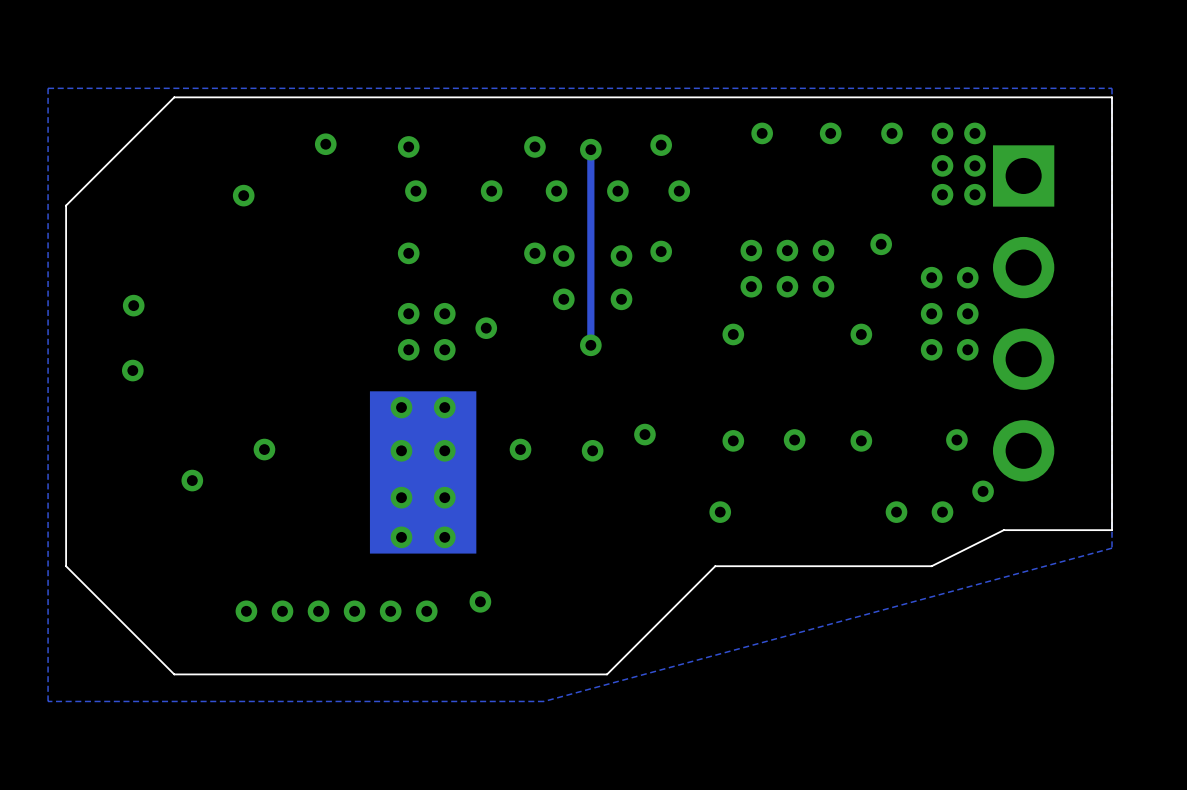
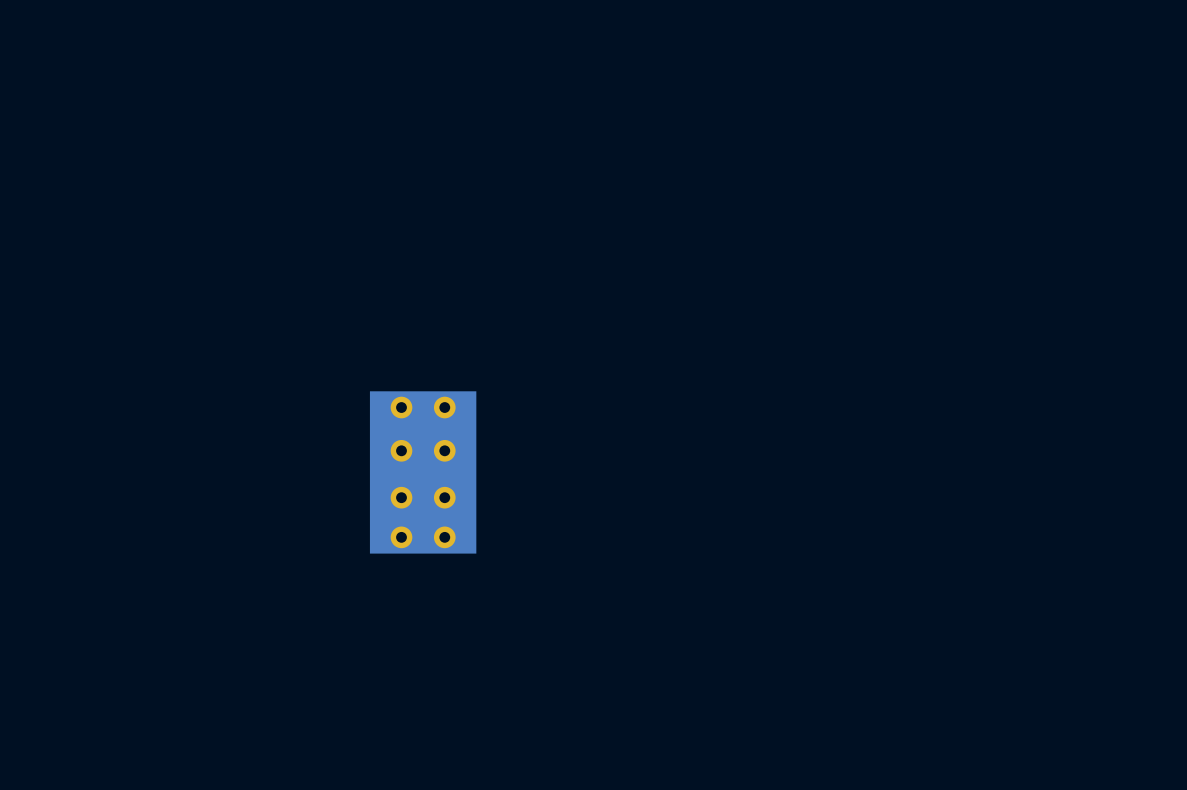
zone outline: (1112, 88) (1112, 548) (543, 701) (48, 701) (48, 88) (1112, 88) -> none
board edge: (1112, 97) (1112, 530) (1003, 530) (931, 566) (715, 566) (607, 674) (174, 674) (66, 566) (66, 205) (174, 97) (1112, 97) -> none
via: (762, 133) -> none
via: (830, 133) -> none
via: (892, 133) -> none
via: (942, 133) -> none
via: (974, 133) -> none
via: (325, 144) -> none
via: (661, 145) -> none
via: (408, 146) -> none
via: (534, 146) -> none
track: (590, 149) (590, 345) -> none
via: (590, 149) -> none
via: (942, 165) -> none
via: (974, 165) -> none
via: (415, 191) -> none
via: (491, 191) -> none
via: (556, 191) -> none
via: (617, 191) -> none
via: (679, 191) -> none
via: (942, 194) -> none
via: (974, 194) -> none
via: (243, 195) -> none
via: (881, 244) -> none
via: (751, 250) -> none
via: (787, 250) -> none
via: (823, 250) -> none
via: (661, 251) -> none
via: (408, 253) -> none
via: (534, 253) -> none
via: (563, 256) -> none
via: (621, 256) -> none
via: (931, 277) -> none
via: (967, 277) -> none
via: (751, 286) -> none
via: (787, 286) -> none
via: (823, 286) -> none
via: (563, 299) -> none
via: (621, 299) -> none
via: (133, 305) -> none
via: (408, 313) -> none
via: (444, 313) -> none
via: (931, 313) -> none
via: (967, 313) -> none
part: (1023, 313) -> none
via: (486, 328) -> none
via: (733, 334) -> none
via: (861, 334) -> none
via: (590, 345) -> none
via: (408, 349) -> none
via: (444, 349) -> none
via: (931, 349) -> none
via: (967, 349) -> none
via: (132, 370) -> none
via: (644, 434) -> none
via: (794, 439) -> none
via: (956, 439) -> none
via: (733, 440) -> none
via: (861, 440) -> none
via: (264, 449) -> none
via: (520, 449) -> none
via: (592, 450) -> none
via: (192, 480) -> none
via: (983, 491) -> none
via: (720, 512) -> none
via: (896, 512) -> none
via: (942, 512) -> none
via: (480, 601) -> none
via: (246, 611) -> none
via: (282, 611) -> none
via: (318, 611) -> none
via: (354, 611) -> none
via: (390, 611) -> none
via: (426, 611) -> none

